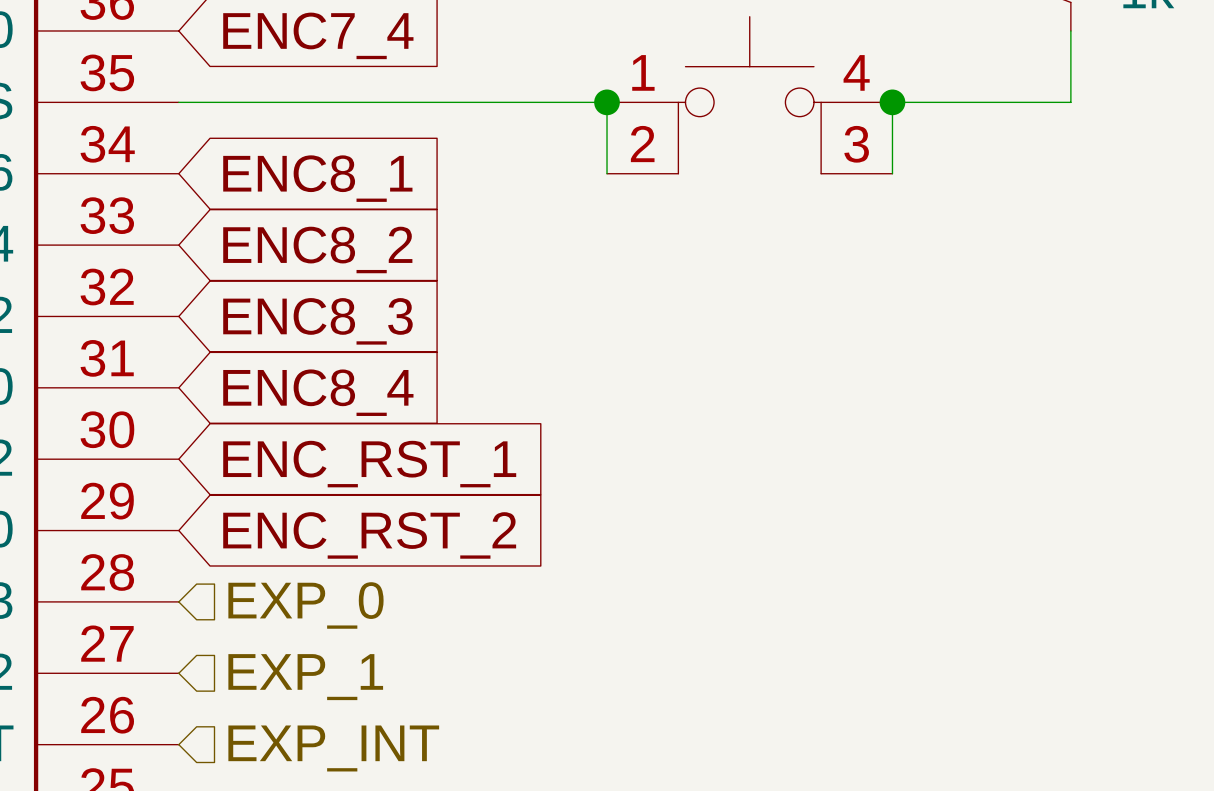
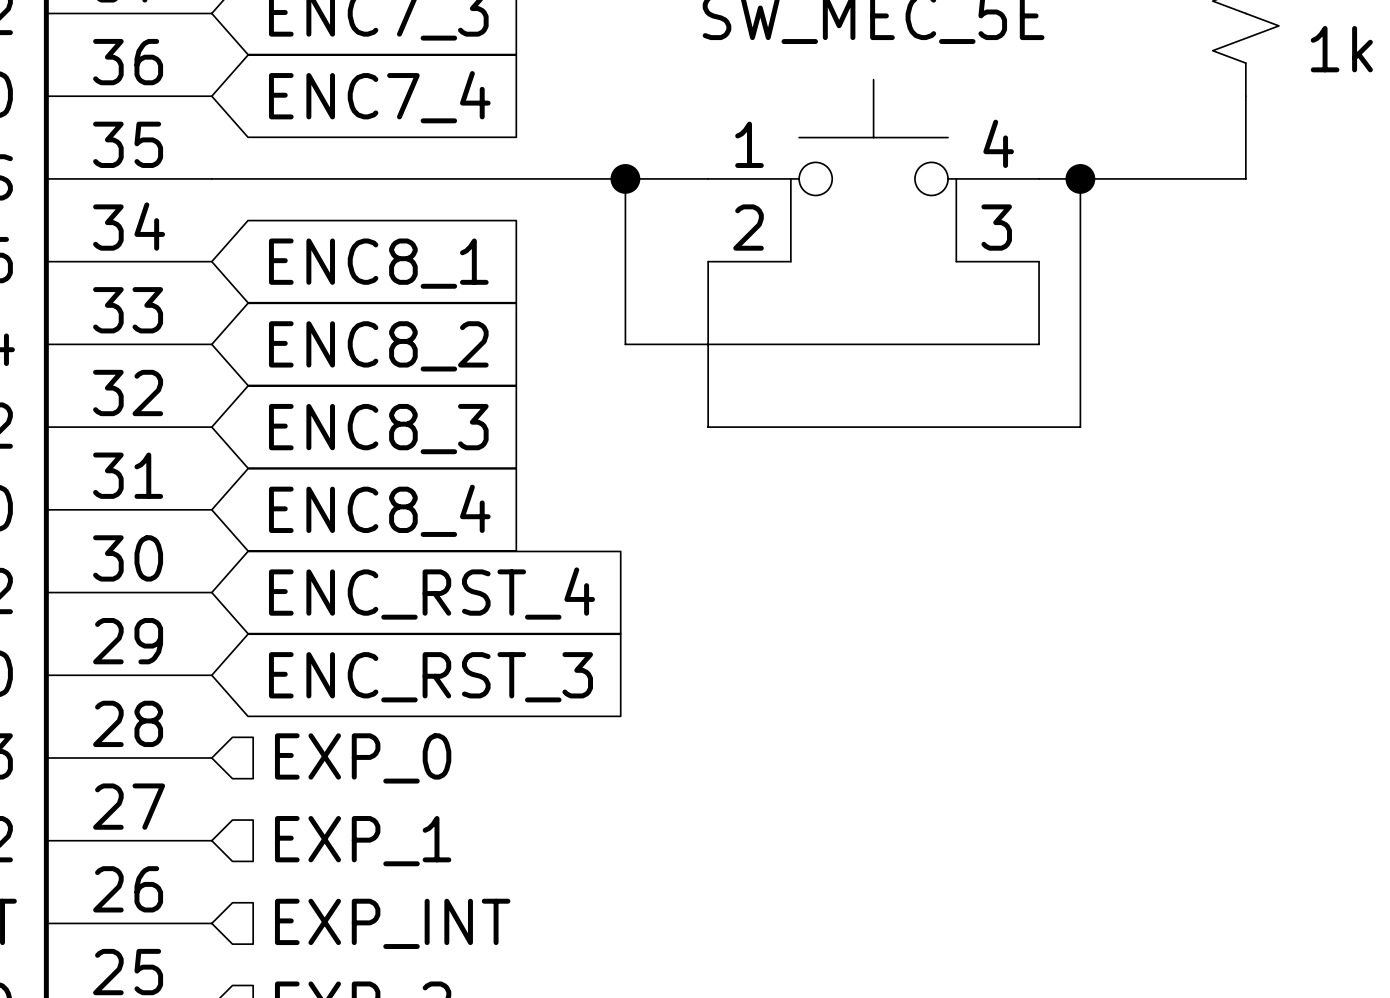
wire: (607, 102) (607, 173) -> (1080, 178) (1080, 427) (708, 427) (708, 261)
junction position: (607, 102) -> (625, 178)
wire: (892, 102) (892, 173) -> (625, 178) (625, 344) (1039, 344) (1039, 261)
junction position: (892, 102) -> (1080, 178)
global label: ENC_RST_1 (369, 464) -> ENC_RST_4 (431, 593)
global label: ENC_RST_2 (369, 535) -> ENC_RST_3 (430, 677)

